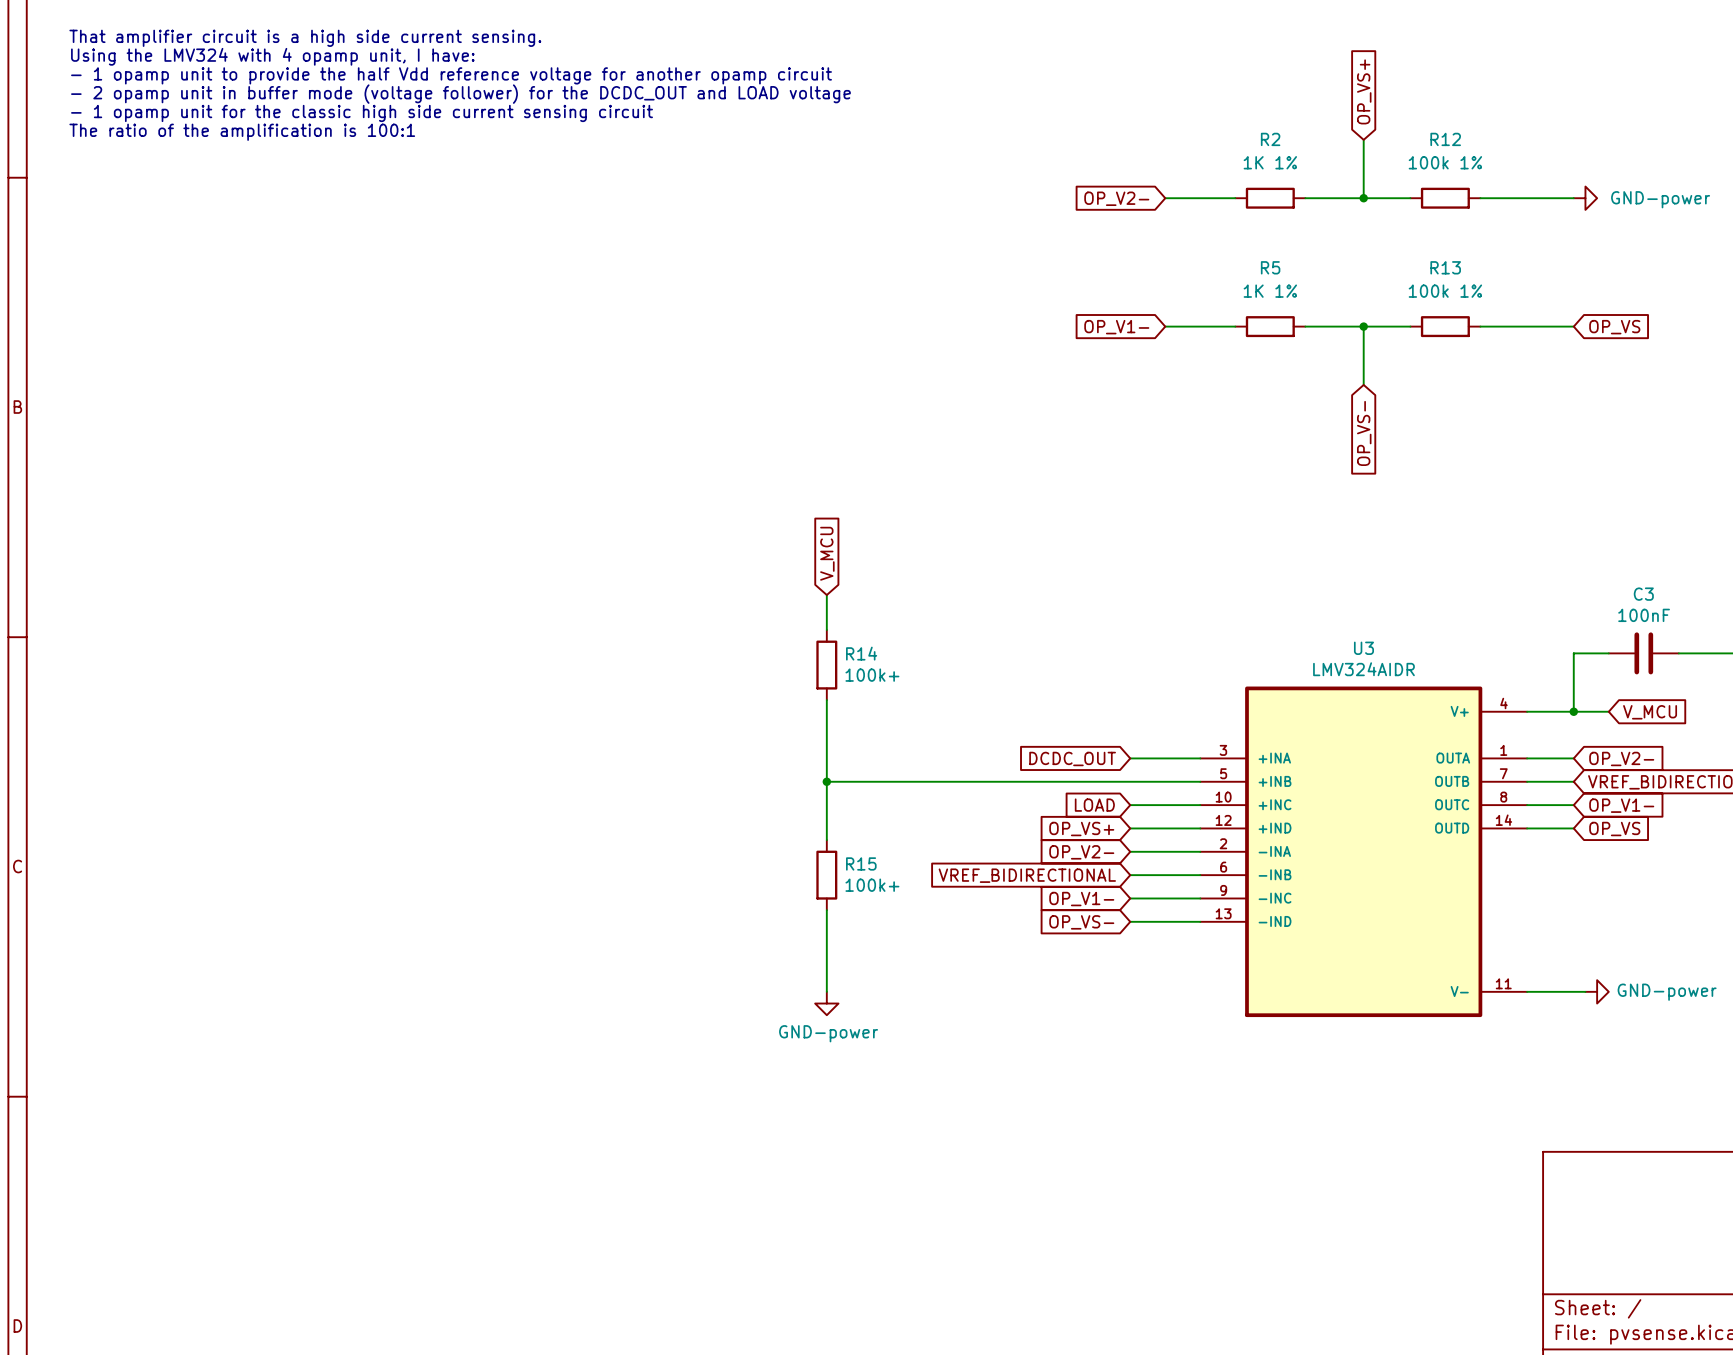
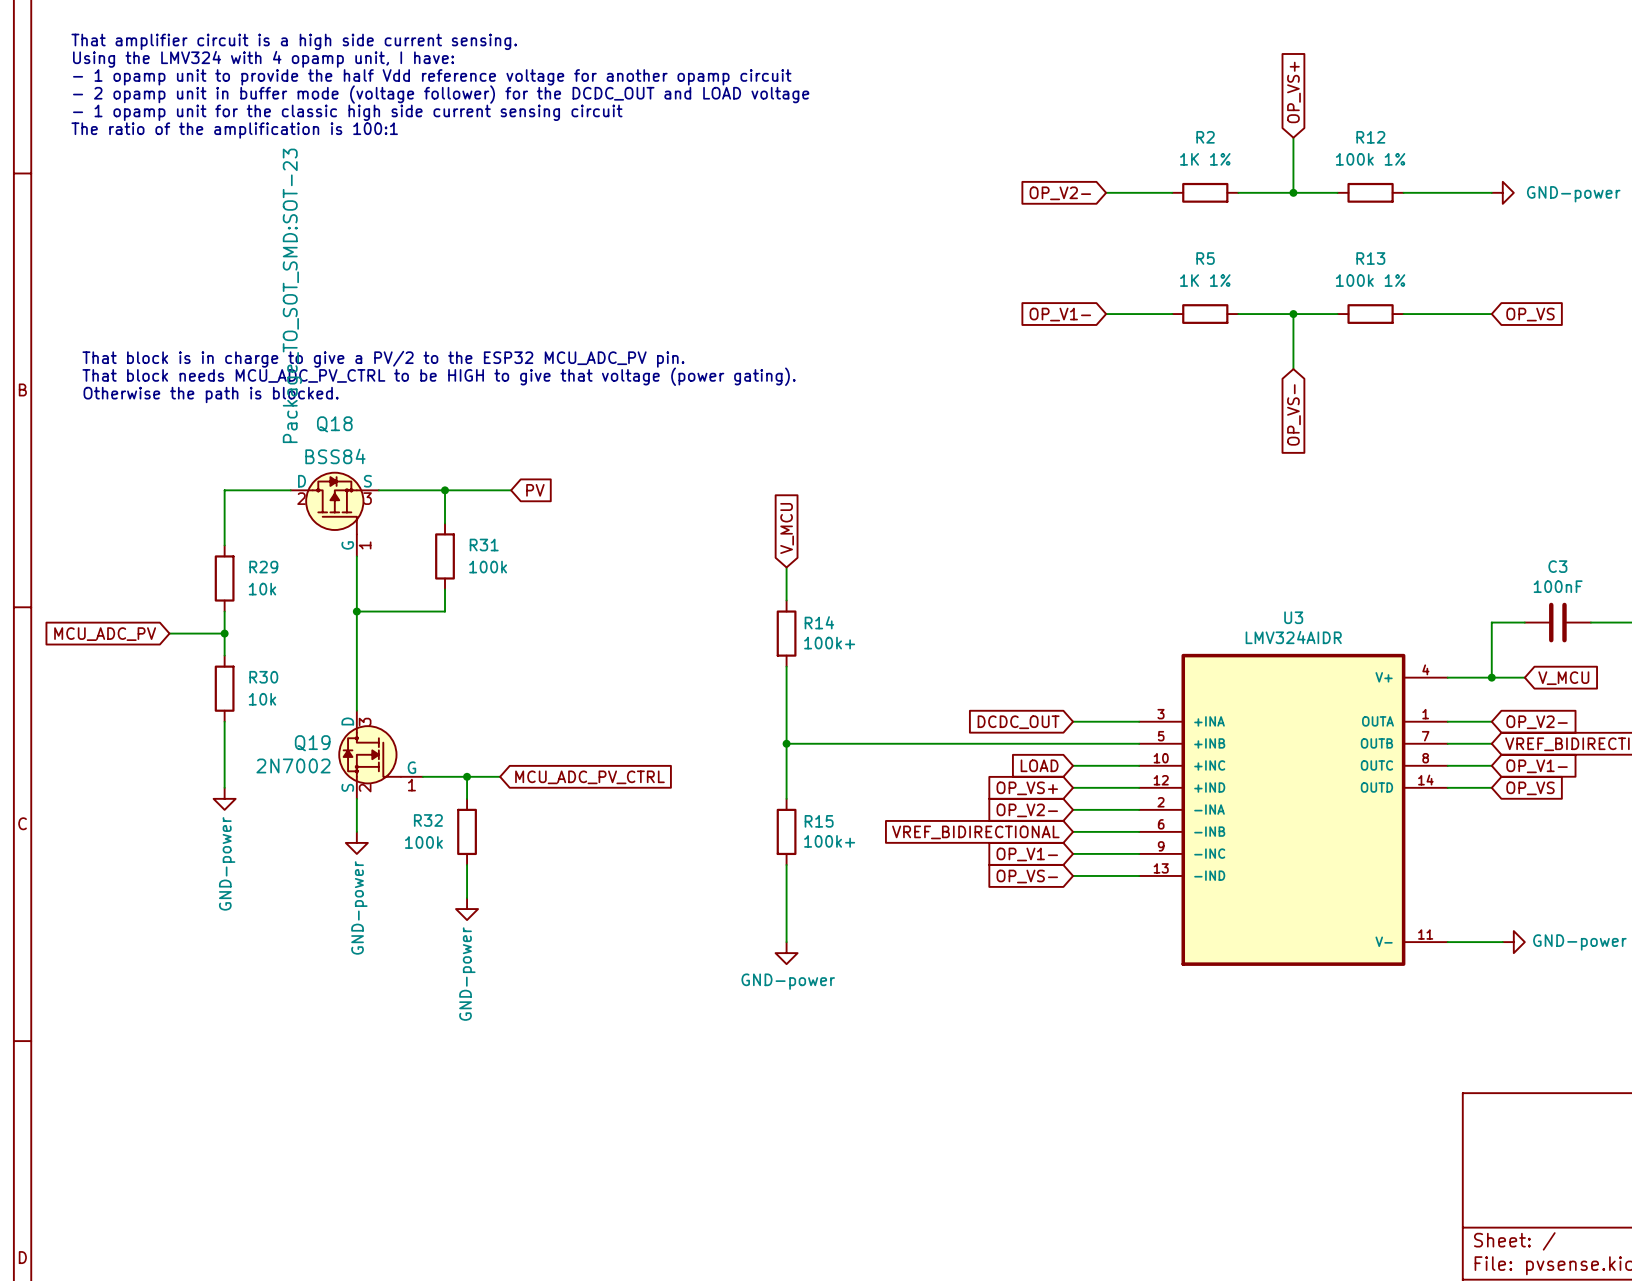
text: none -> That block is in charge to give a PV/2 to the ESP32 MCU_ADC_PV pin. (383, 359)
text: none -> That block needs MCU_ADC_PV_CTRL to be HIGH to give that voltage (power gating). (439, 376)
text: none -> Otherwise the path is blocked. (211, 394)
wire: none -> (290, 490) (224, 490) (224, 545)
wire: none -> (378, 490) (511, 490)
wire: none -> (445, 490) (445, 523)
junction: none -> (445, 490)
global label: none -> PV (535, 490)
Q18: none -> BSS84 (334, 514)
wire: none -> (356, 556) (356, 710)
R31: none -> 100k (445, 556)
R29: none -> 10k (224, 578)
wire: none -> (445, 589) (445, 611) (356, 611)
wire: none -> (224, 611) (224, 655)
junction: none -> (356, 611)
global label: none -> MCU_ADC_PV (105, 634)
wire: none -> (169, 633) (224, 633)
junction: none -> (224, 633)
R30: none -> 10k (224, 688)
wire: none -> (224, 721) (224, 787)
Q19: none -> 2N7002 (381, 754)
wire: none -> (422, 776) (500, 776)
wire: none -> (467, 776) (467, 798)
junction: none -> (467, 776)
global label: none -> MCU_ADC_PV_CTRL (589, 777)
power symbol: none -> GND-power (224, 798)
wire: none -> (356, 798) (356, 831)
R32: none -> 100k (467, 831)
power symbol: none -> GND-power (356, 842)
wire: none -> (467, 864) (467, 898)
power symbol: none -> GND-power (467, 909)

